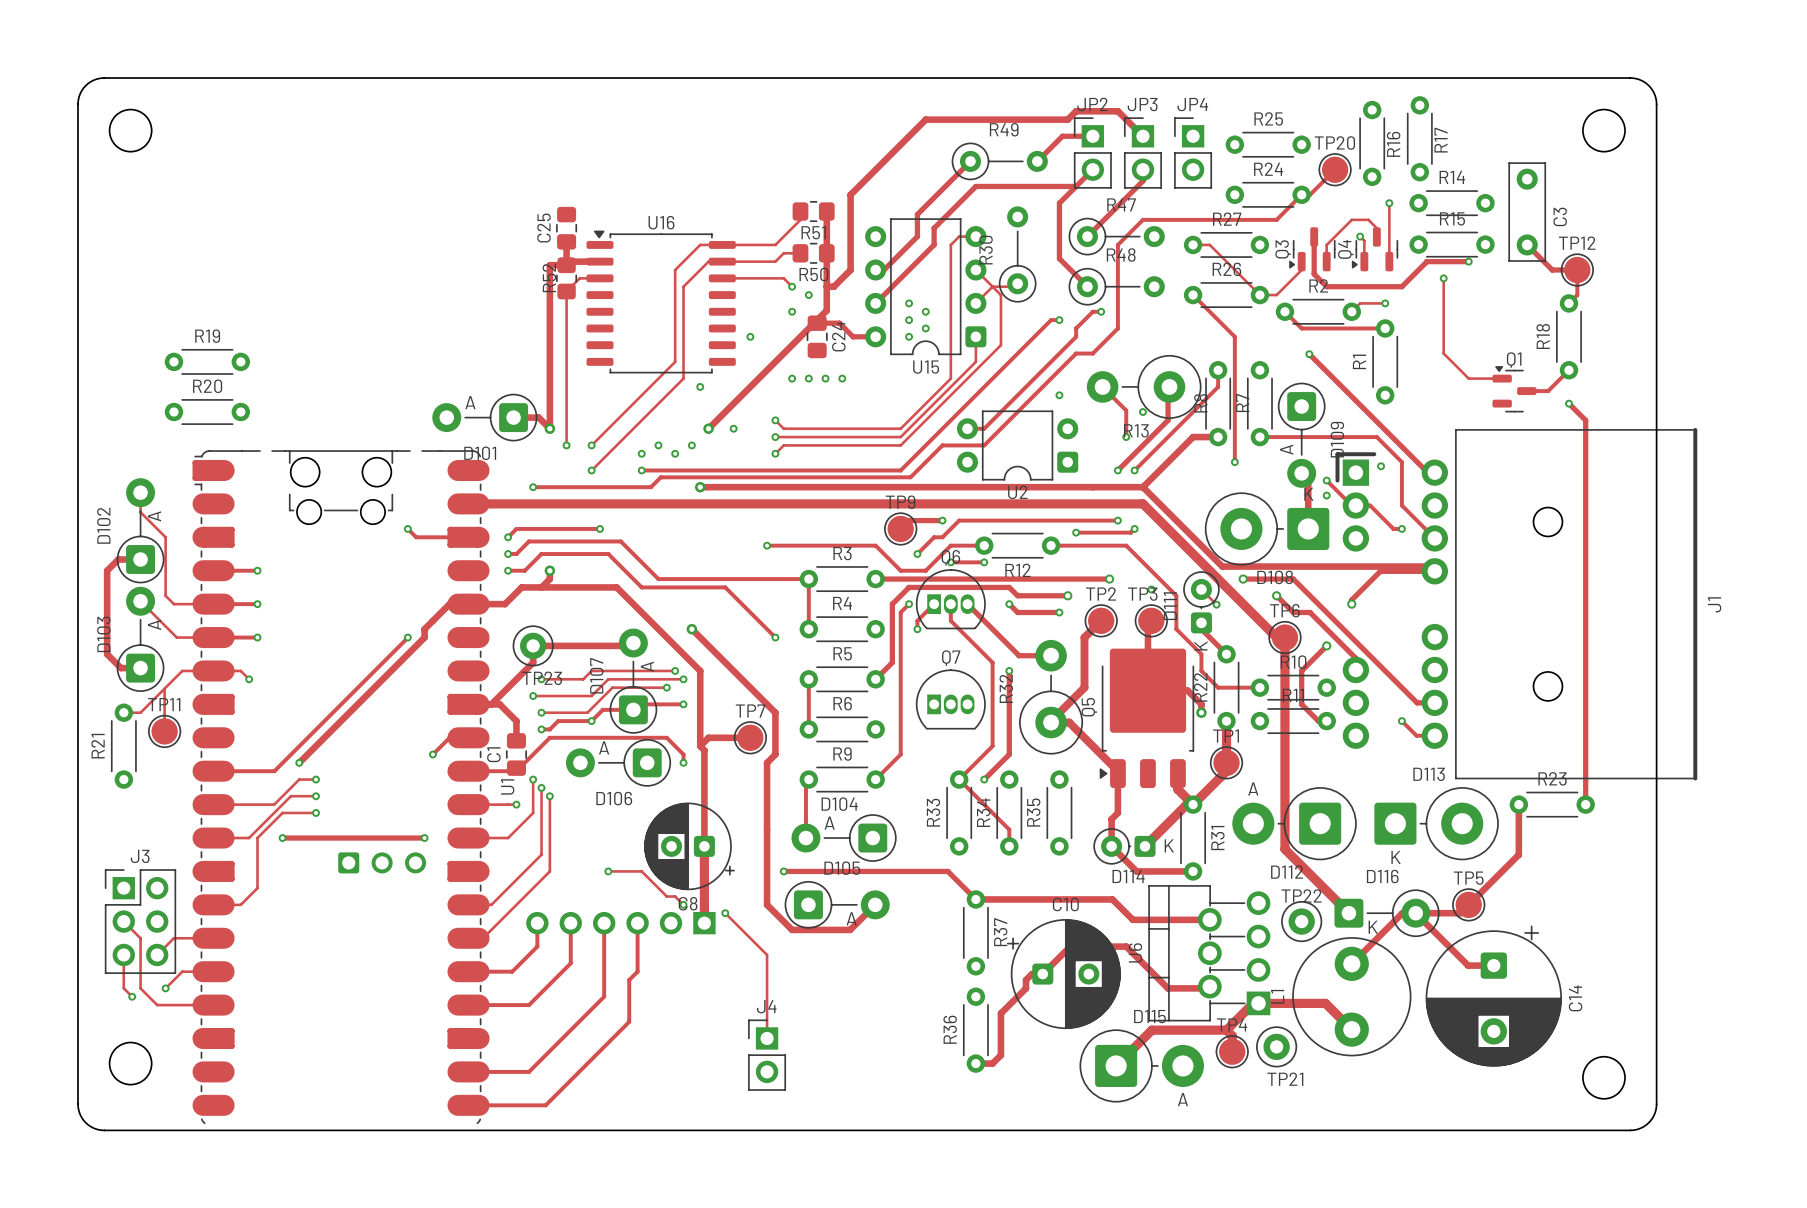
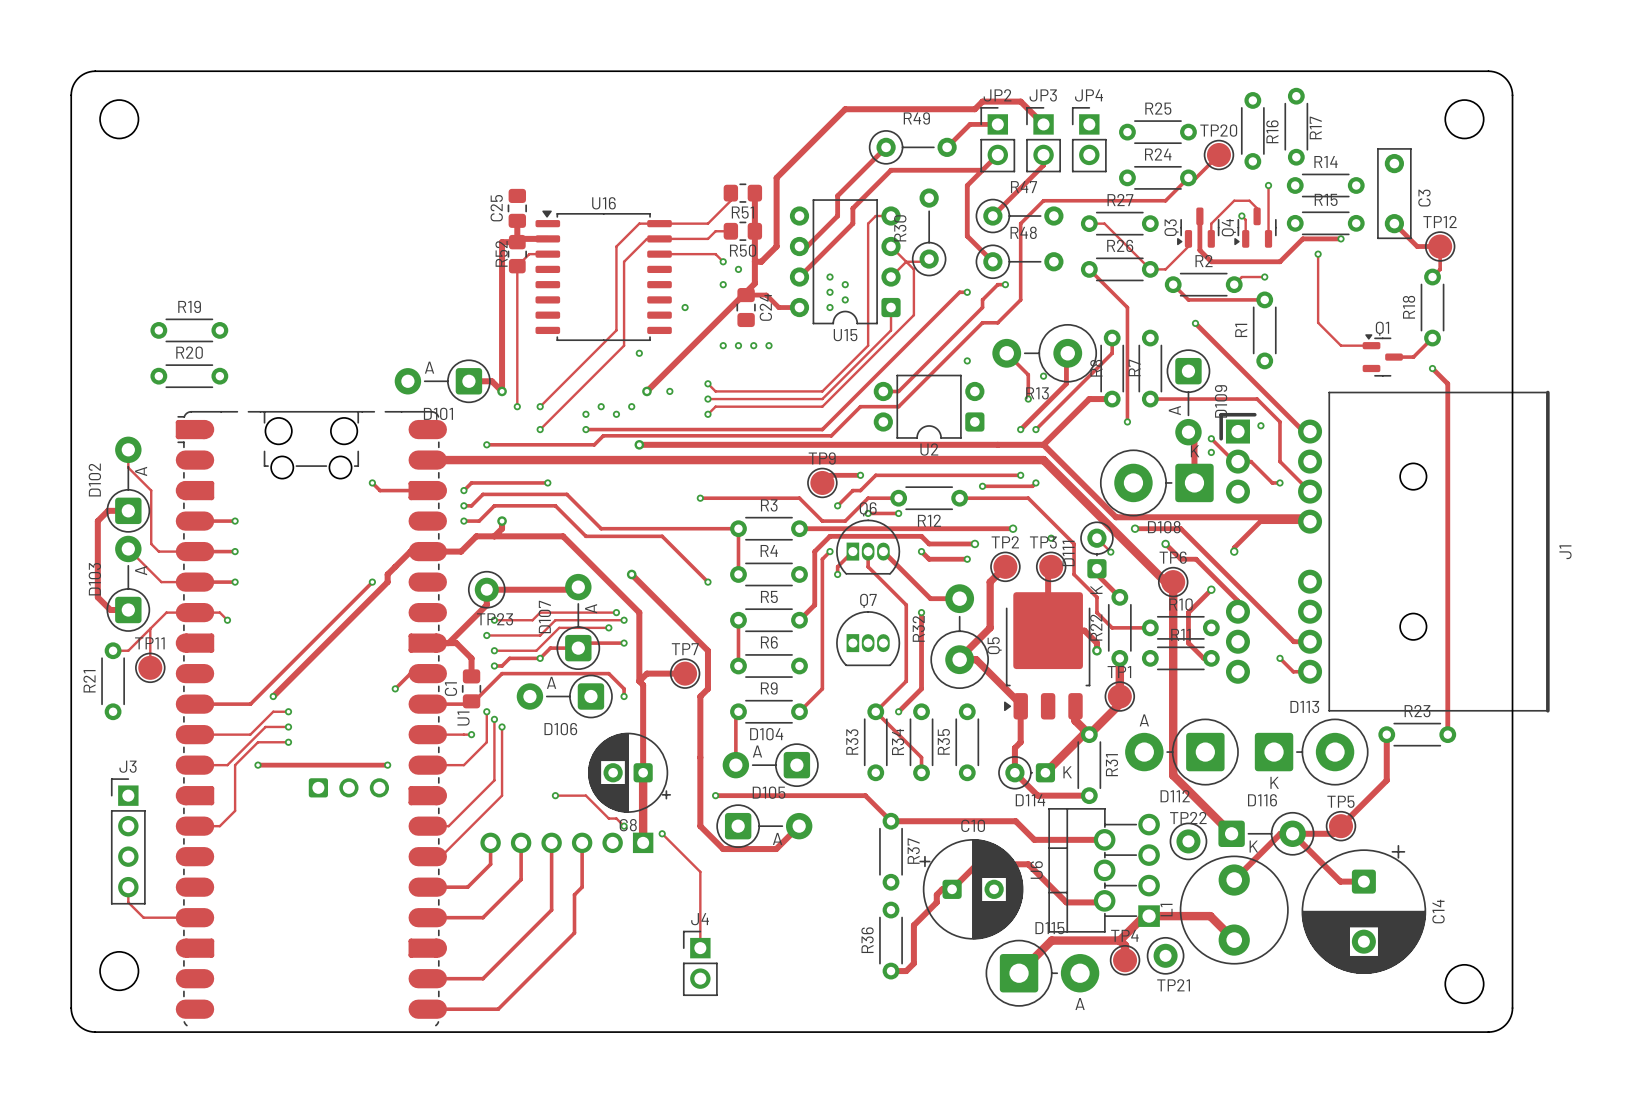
J3 footprint: [104, 869, 177, 974] -> [111, 778, 146, 905]
track: (123, 921) (140, 938) -> none
track: (140, 938) (140, 971) -> none
track: (213, 938) (173, 938) (157, 954) -> none
track: (123, 954) (123, 988) (132, 996) -> none
track: (213, 971) (182, 971) (165, 988) -> none
via: (165, 988) -> none
via: (132, 996) -> none

